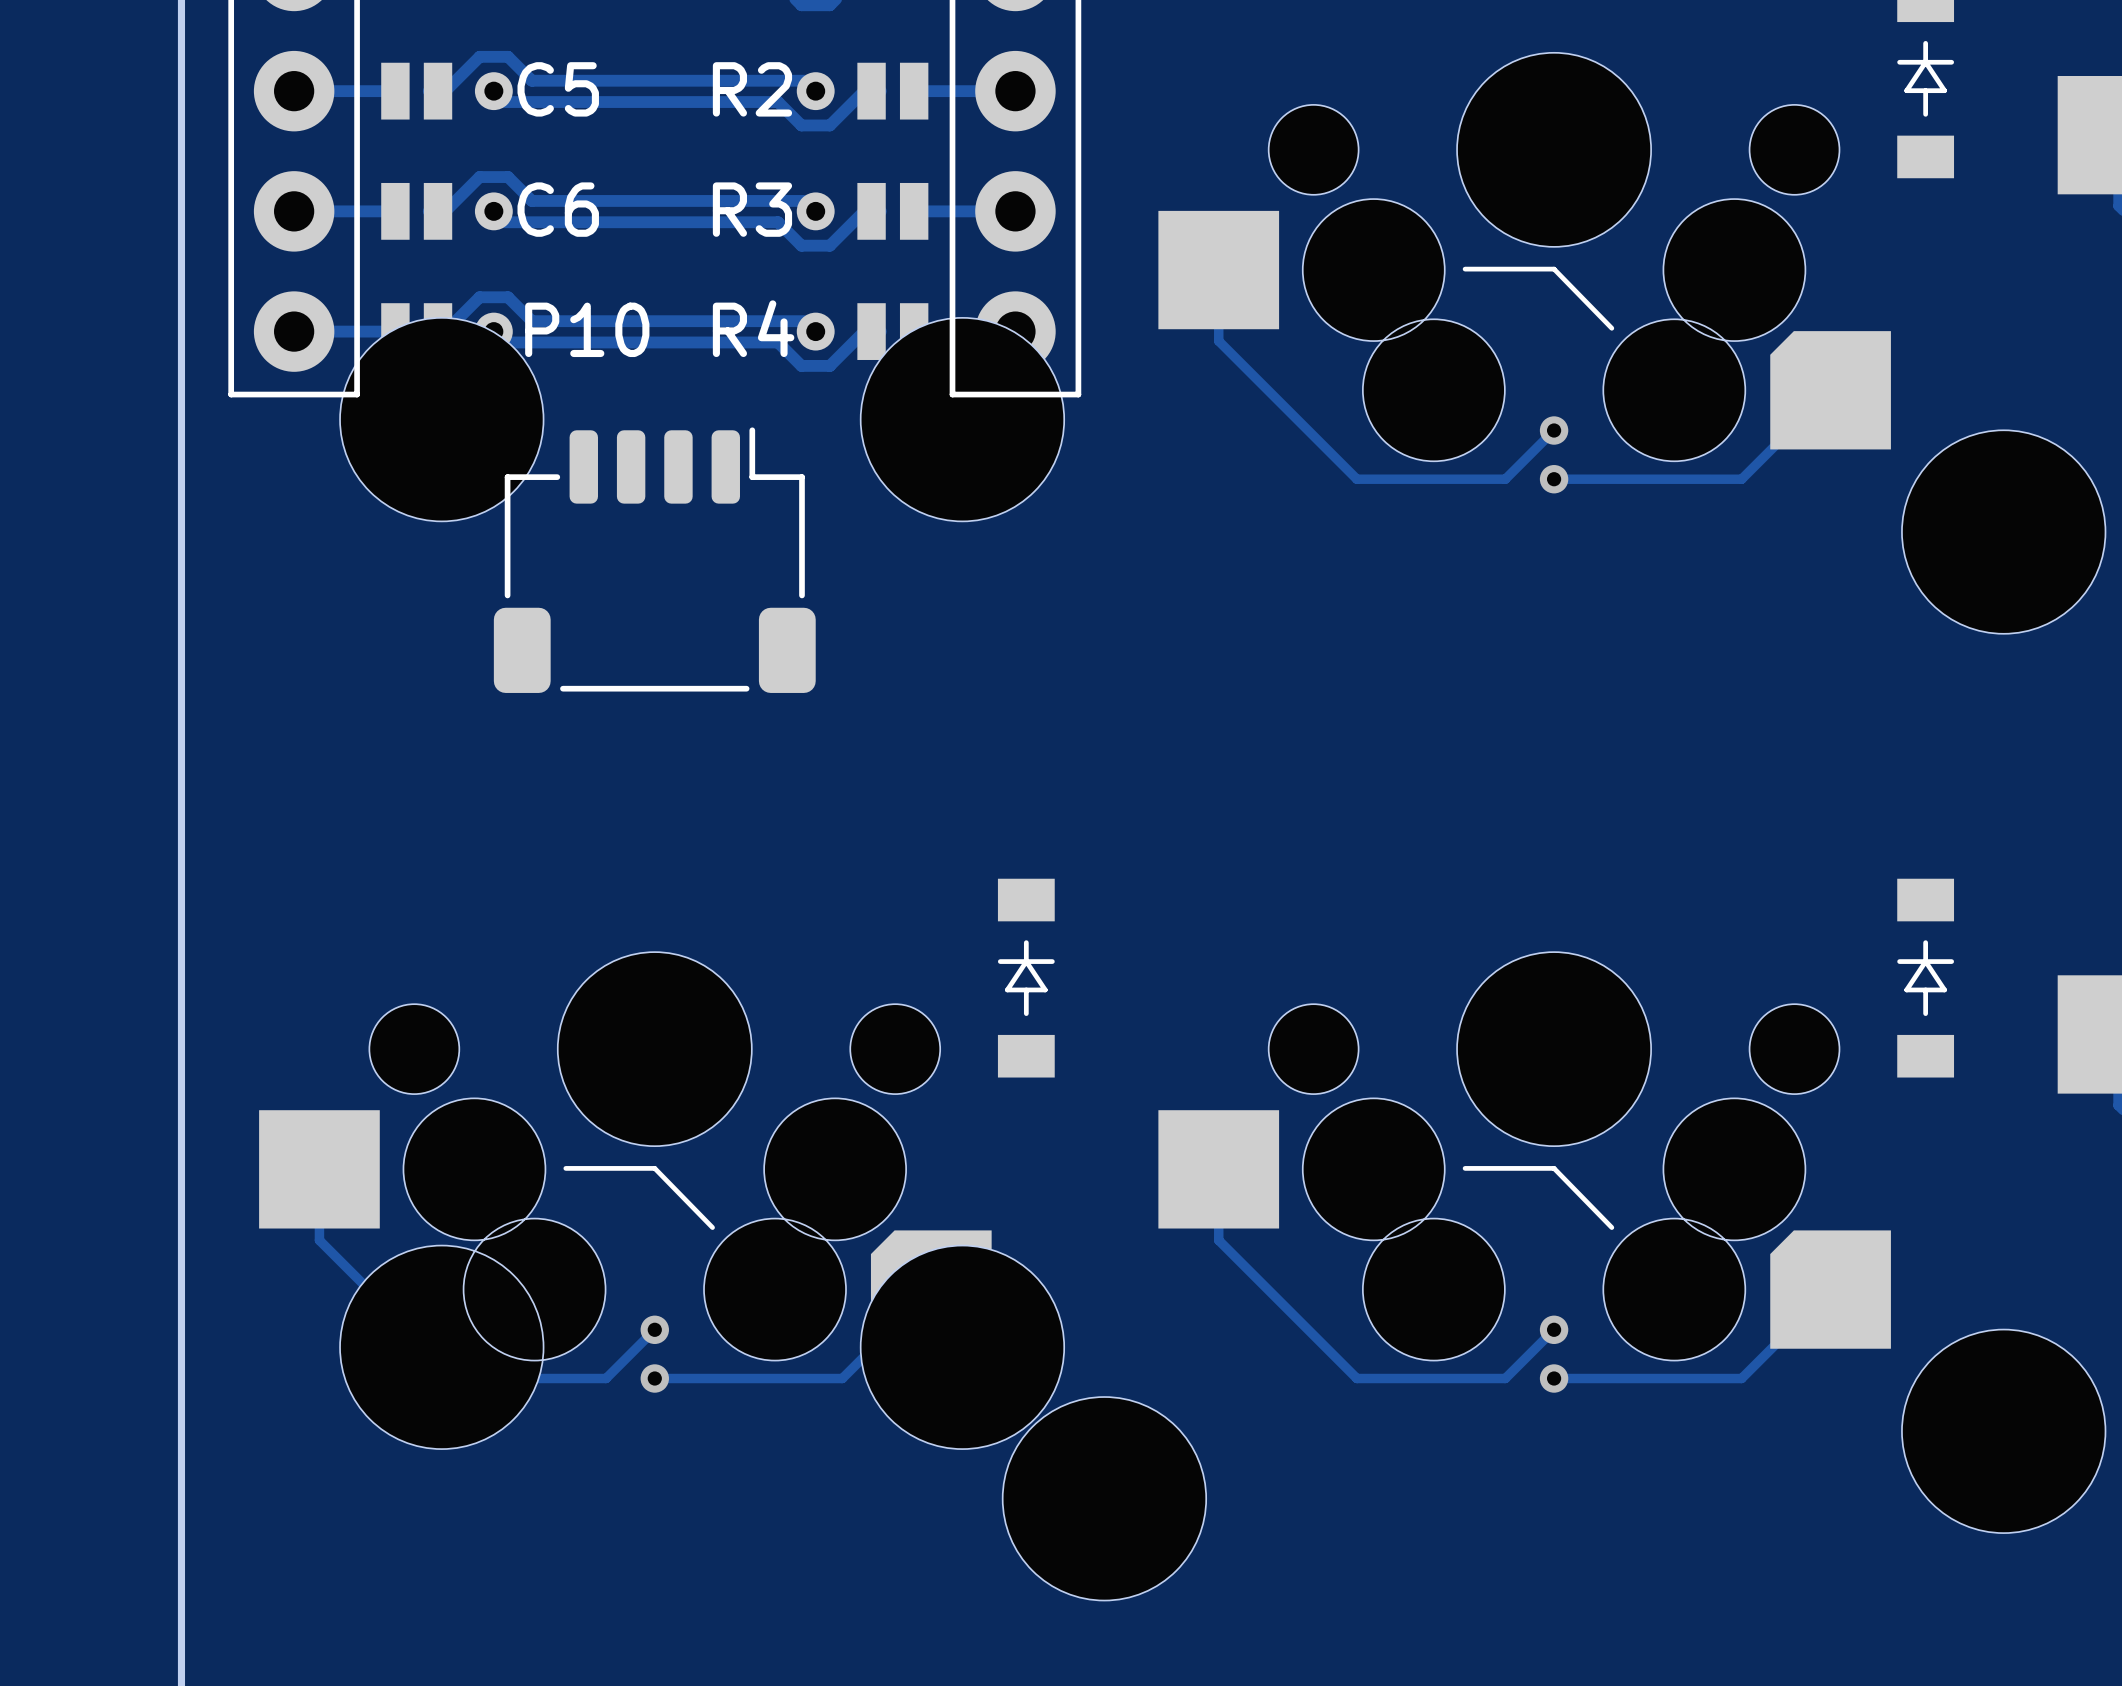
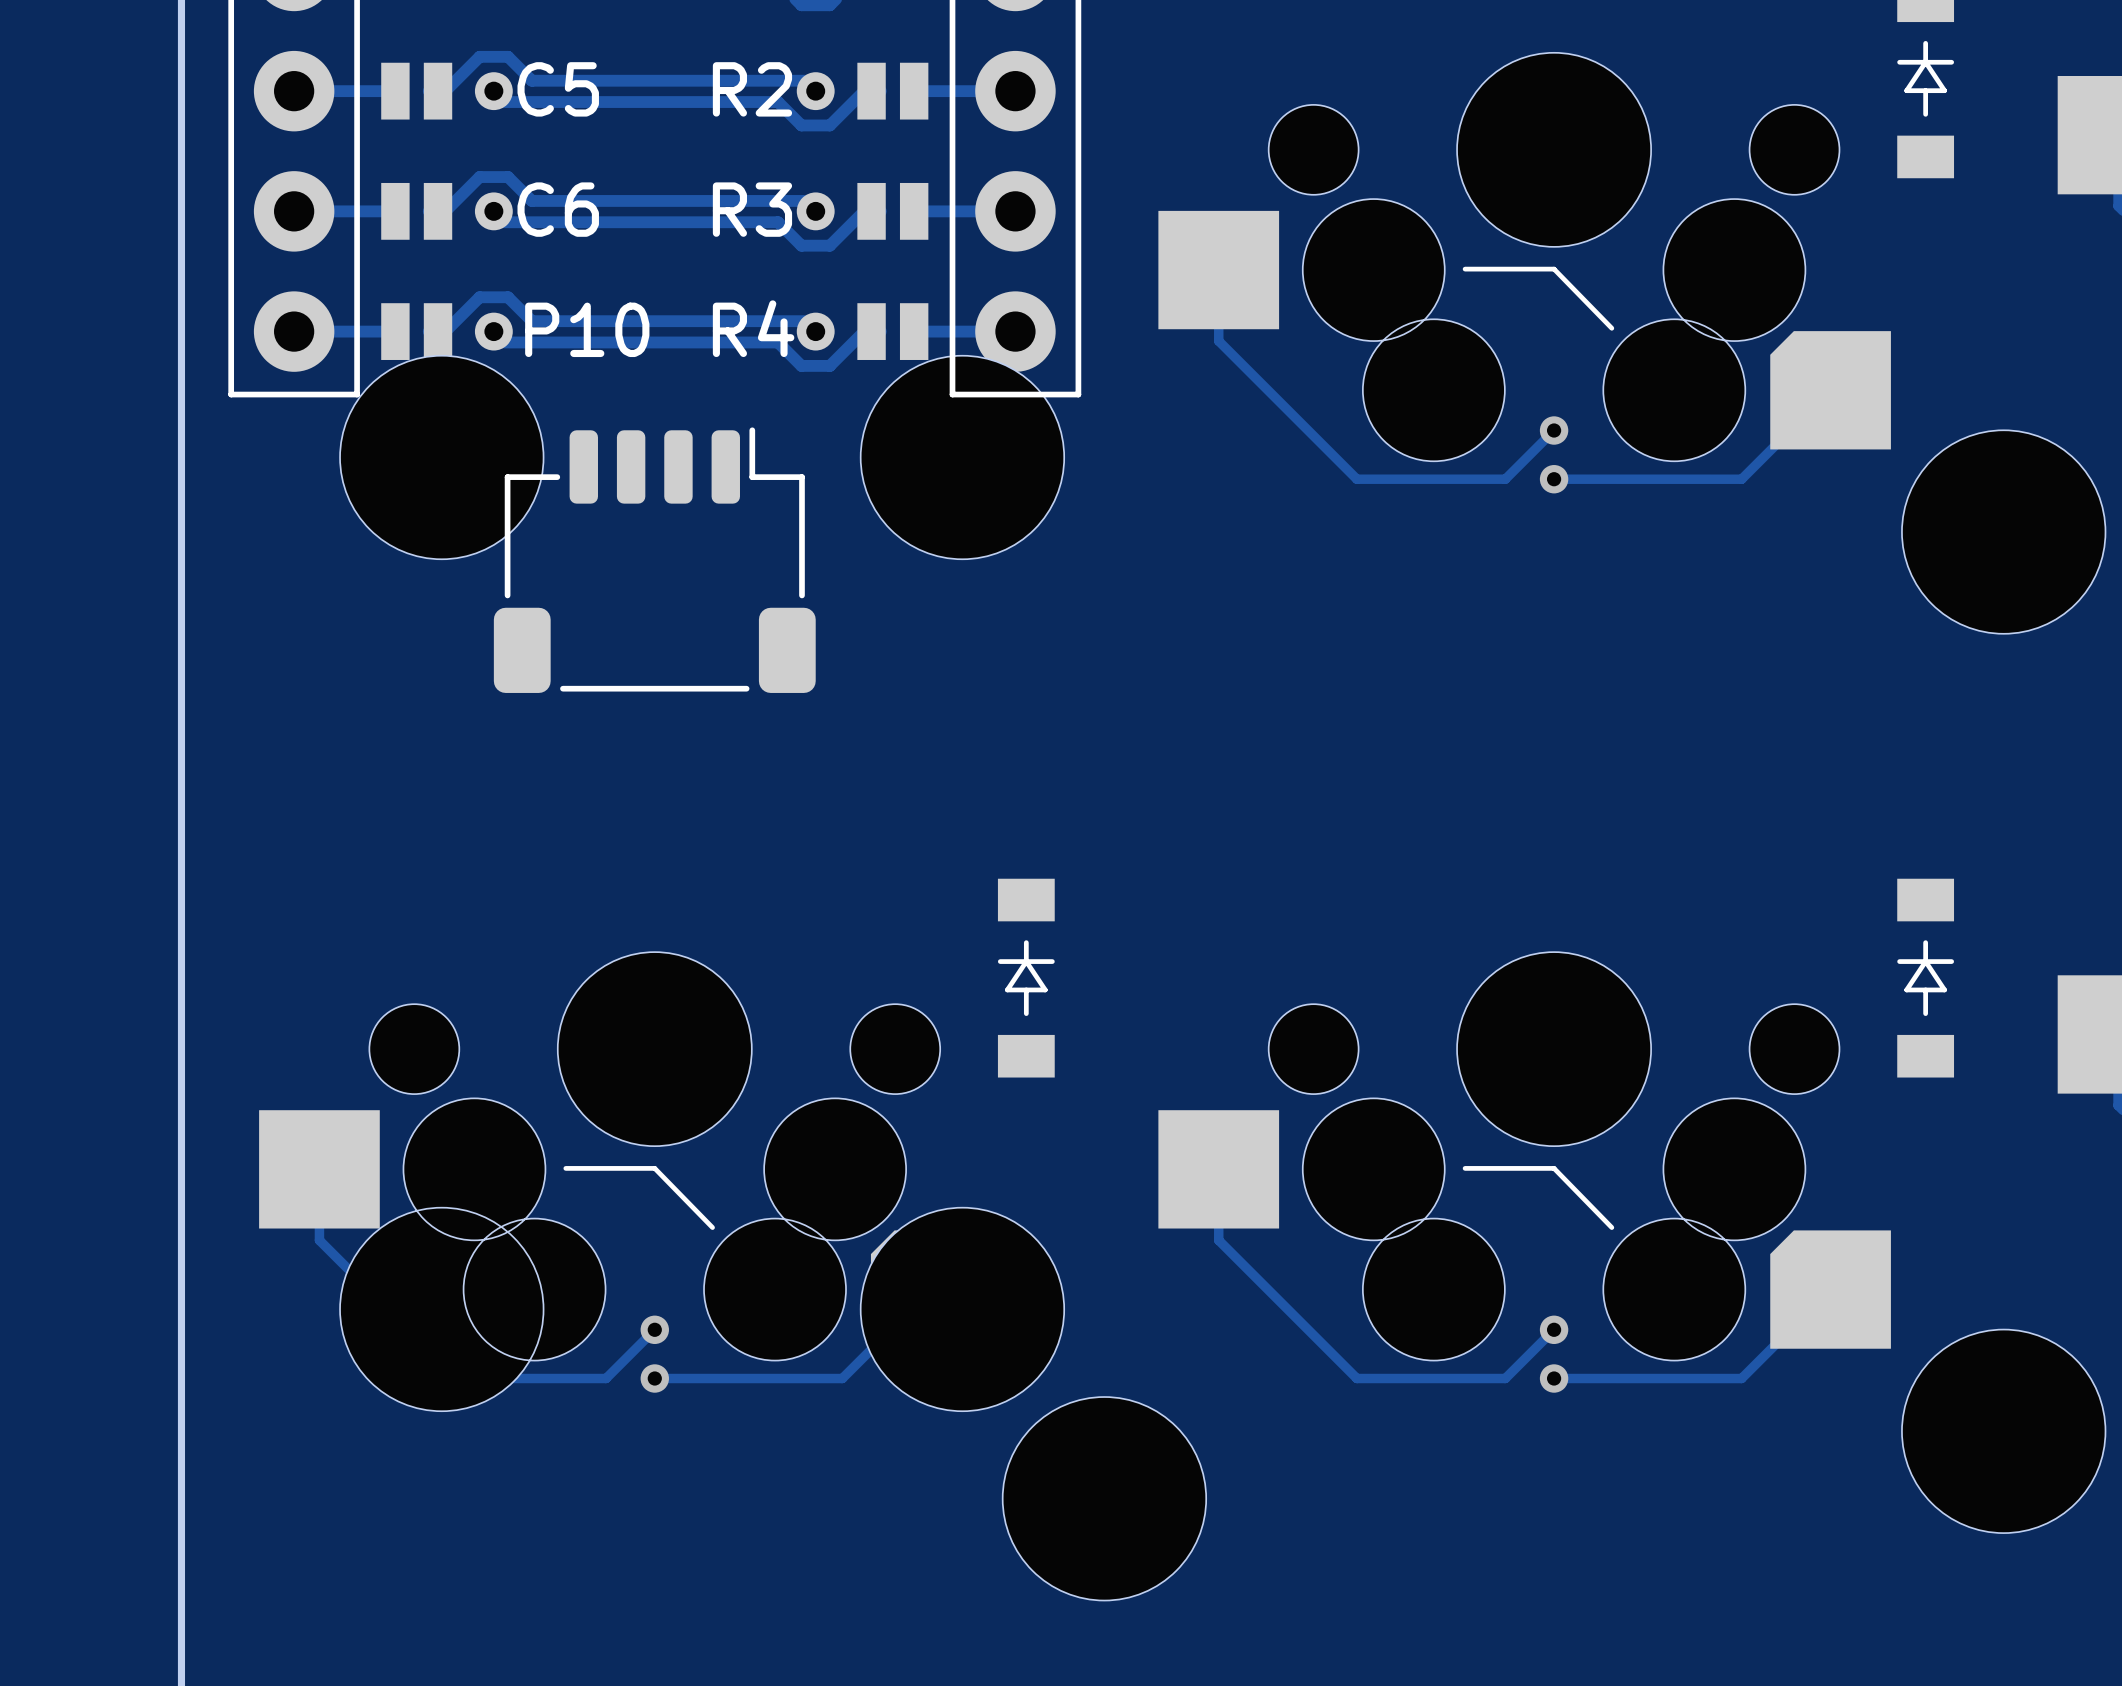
part position: (441, 419) -> (441, 457)
part position: (962, 419) -> (962, 457)
part position: (441, 1347) -> (441, 1309)
part position: (962, 1347) -> (962, 1309)

